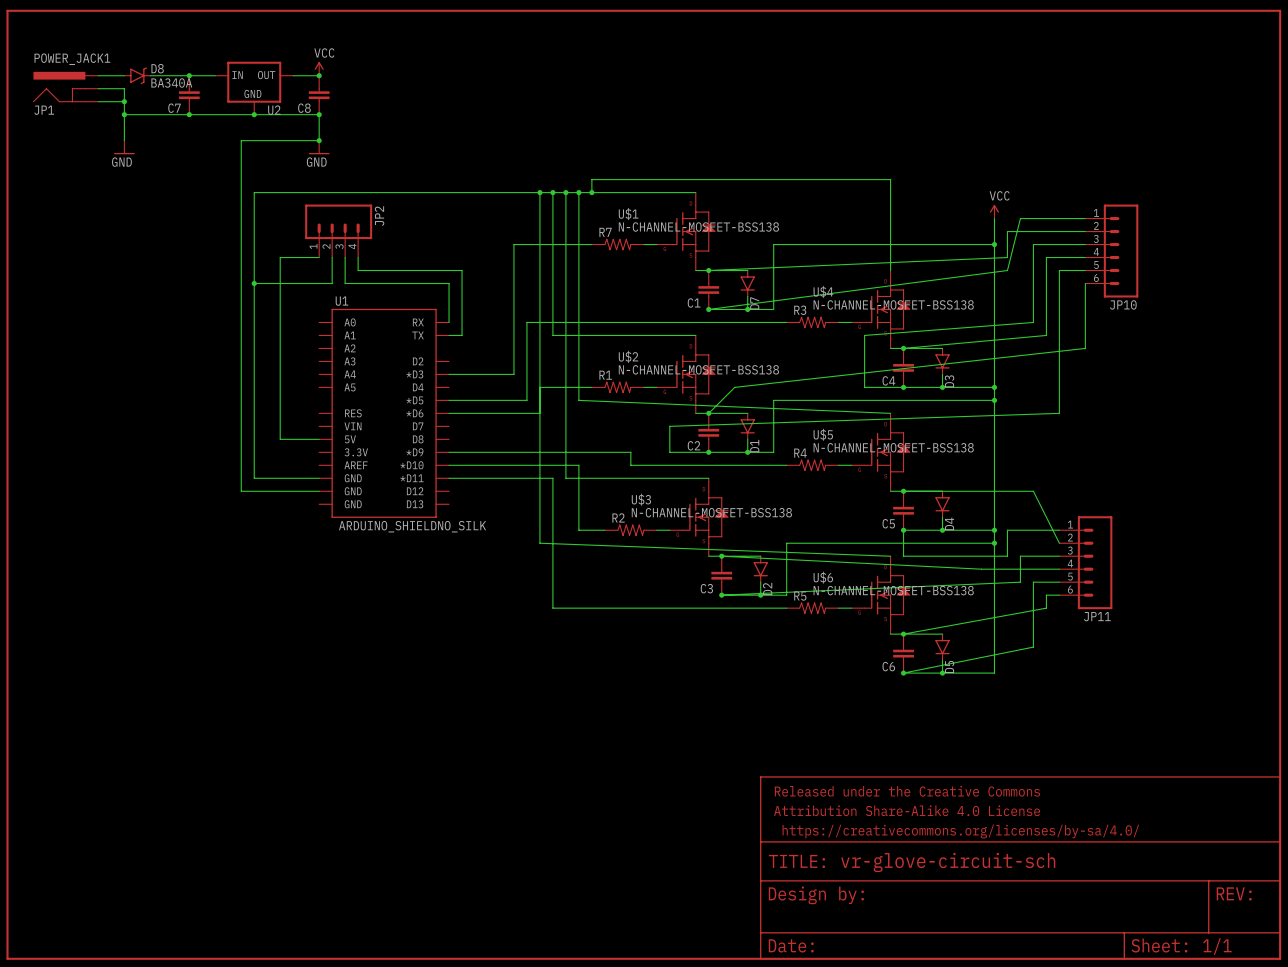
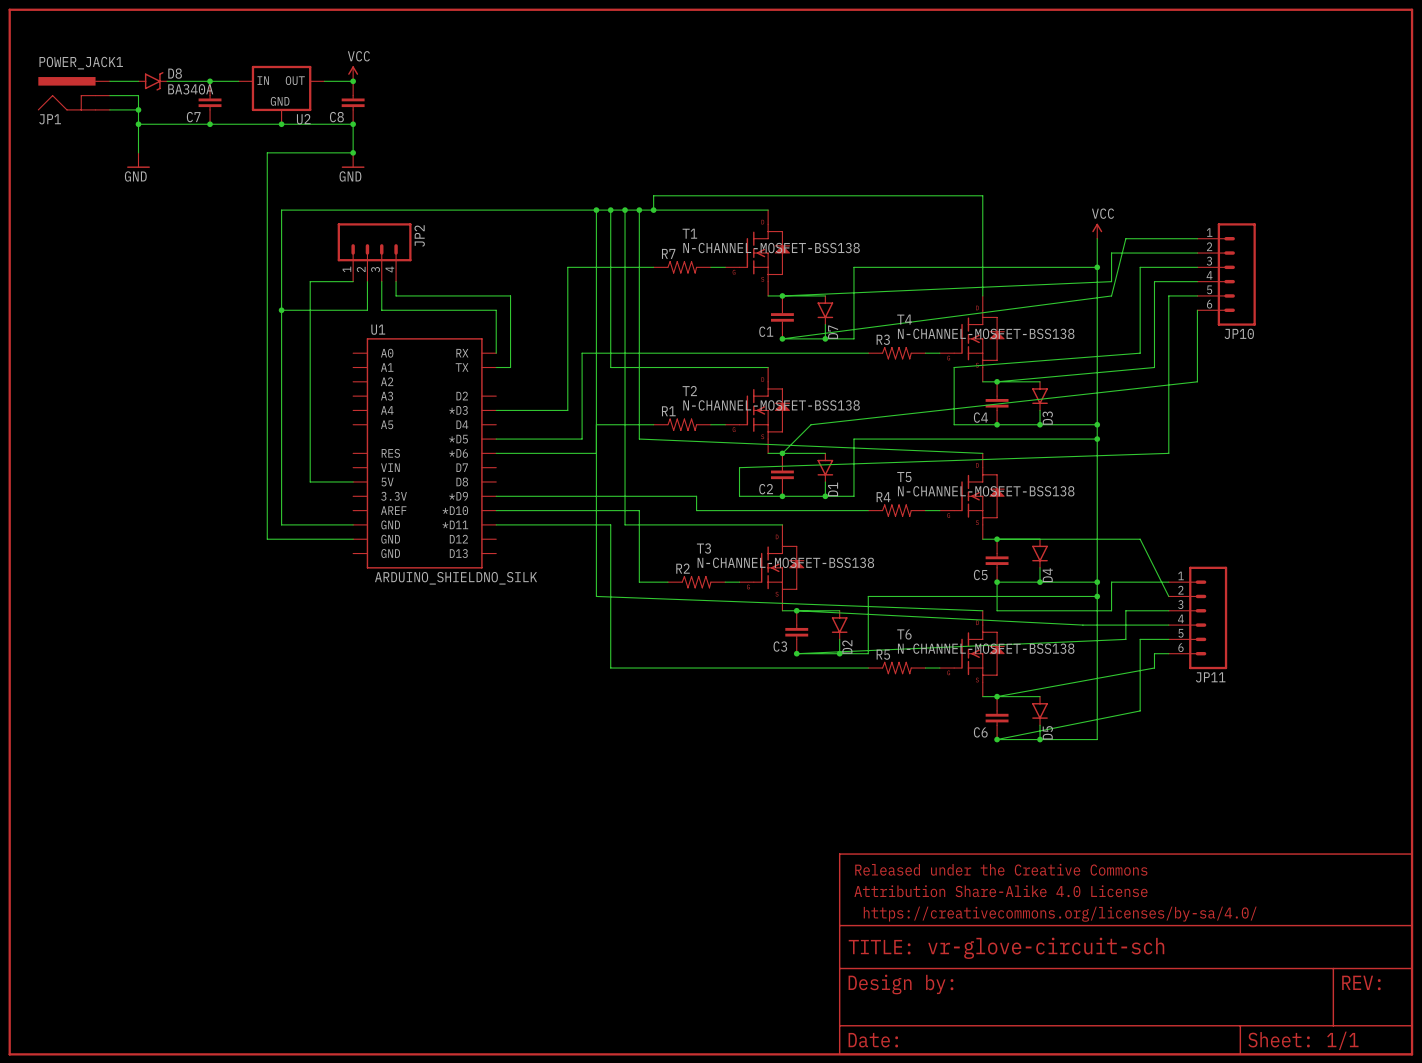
U$1 name: U$1 (628, 214) -> T1 (689, 233)
U$4 name: U$4 (823, 291) -> T4 (904, 319)
U$2 name: U$2 (628, 356) -> T2 (689, 391)
U$5 name: U$5 (823, 434) -> T5 (904, 477)
U$3 name: U$3 (641, 499) -> T3 (703, 548)
U$6 name: U$6 (823, 577) -> T6 (904, 634)

